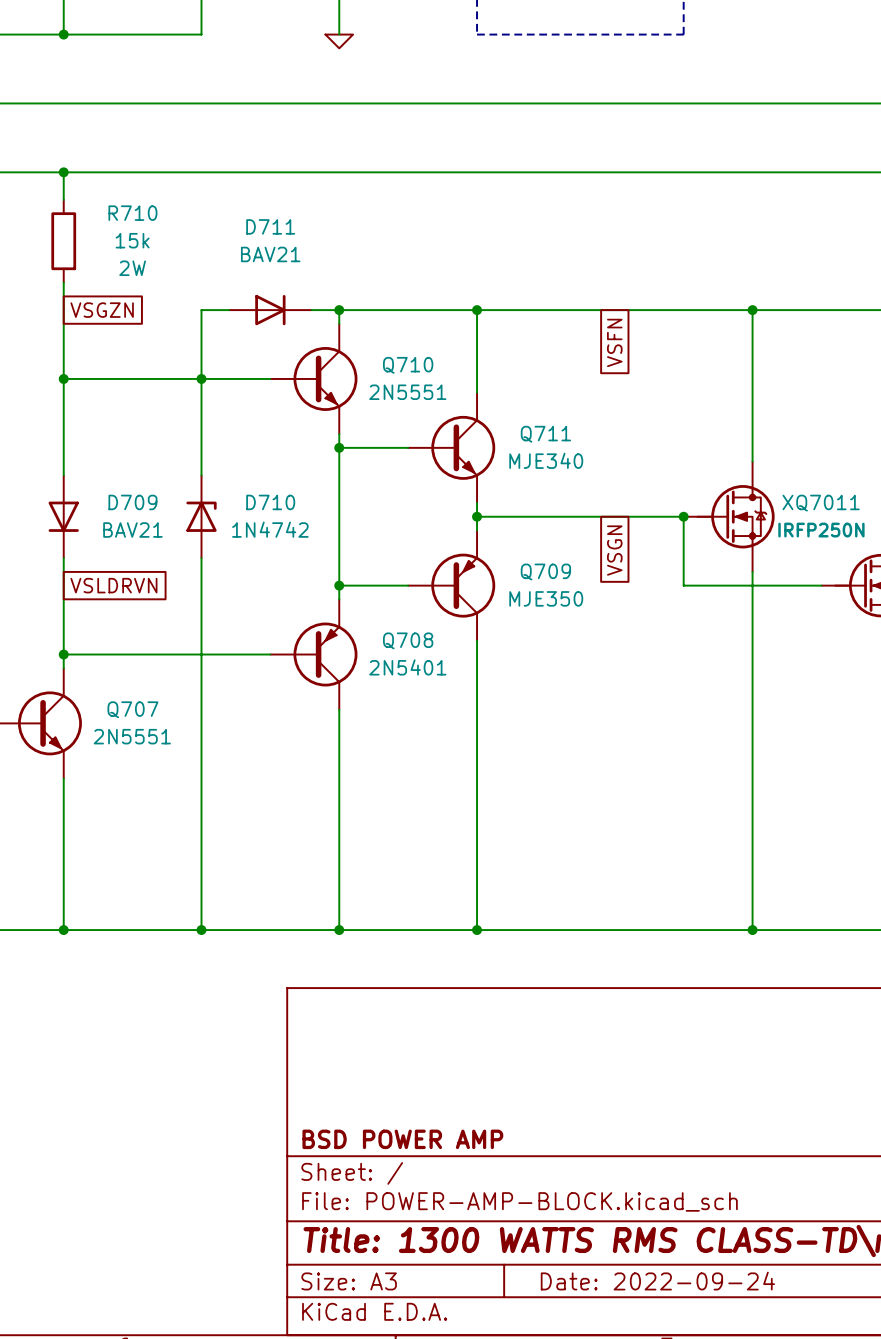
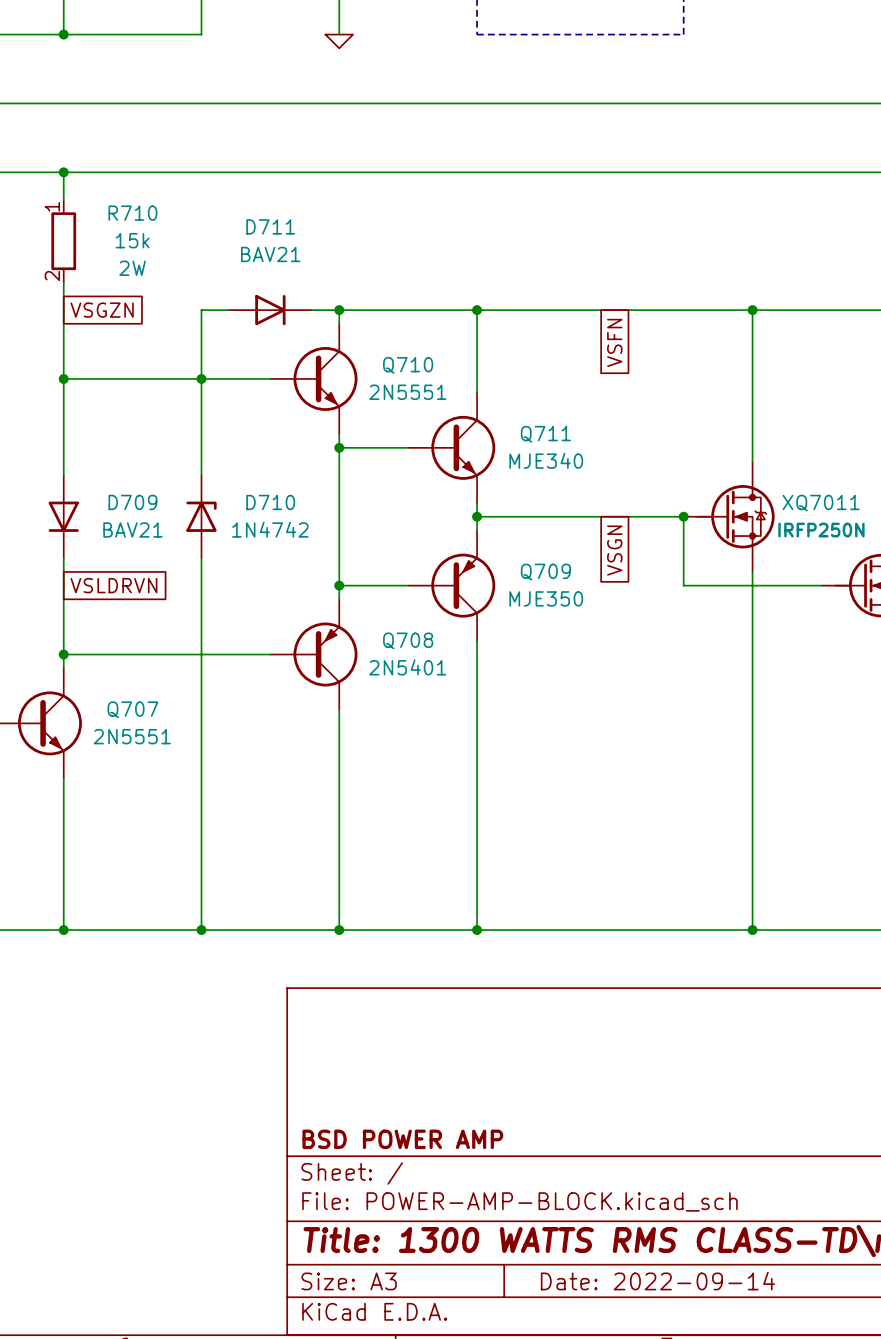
R710 pin number: none -> 1 (52, 206)
R710 pin number: none -> 2 (52, 275)
title block: Date: 2022-09-24 (657, 1281) -> Date: 2022-09-14 (657, 1281)

